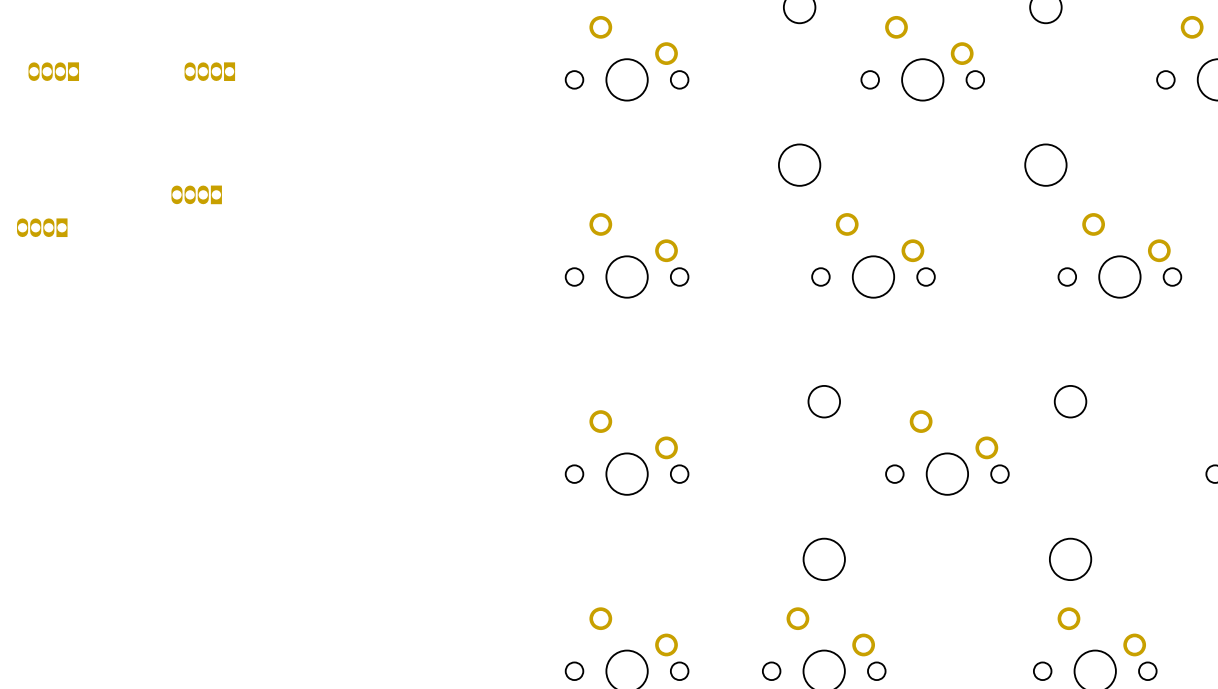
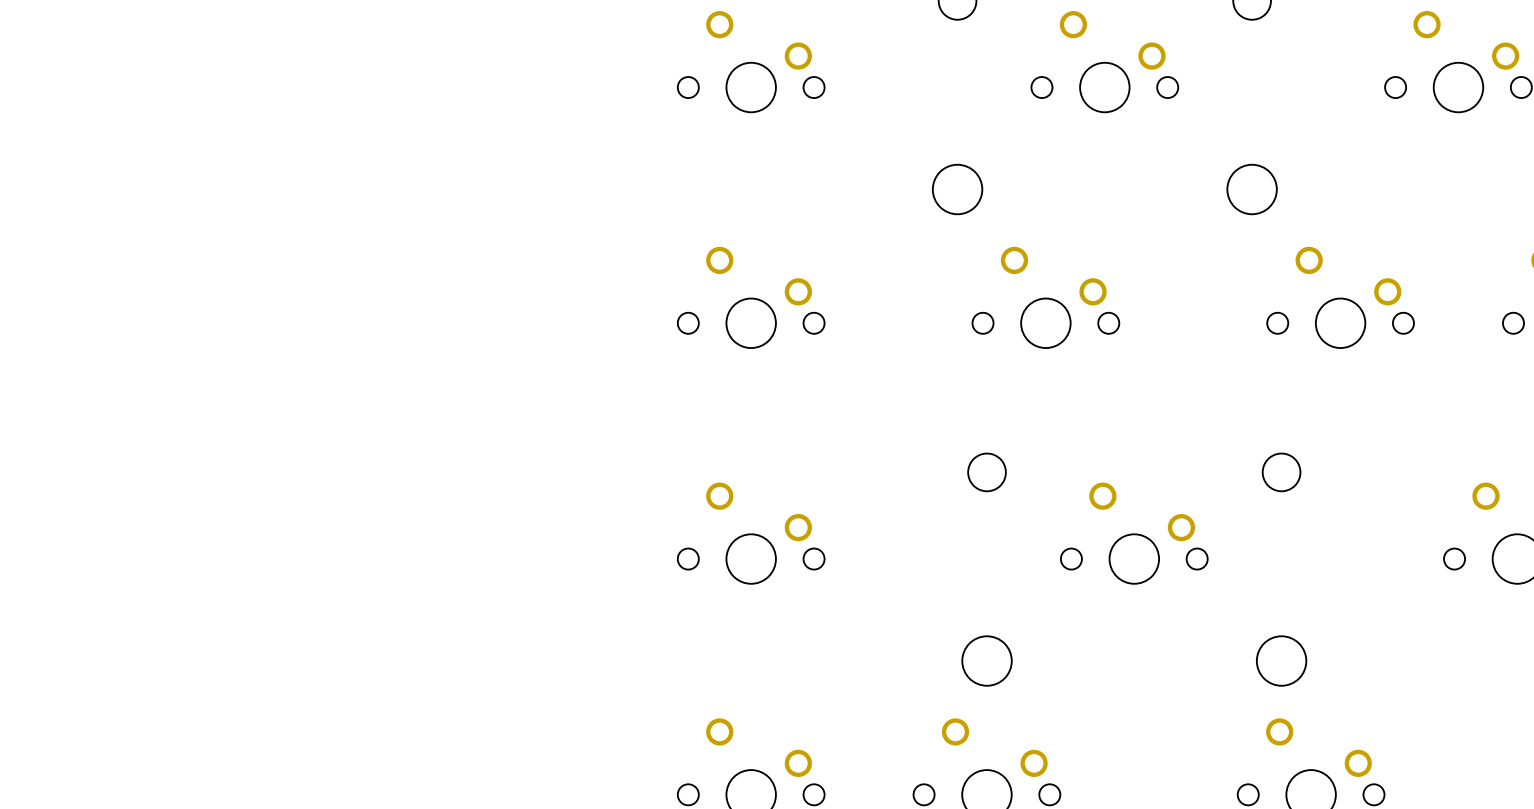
part: (53, 71) -> none
part: (209, 71) -> none
part: (196, 194) -> none
part: (42, 227) -> none

